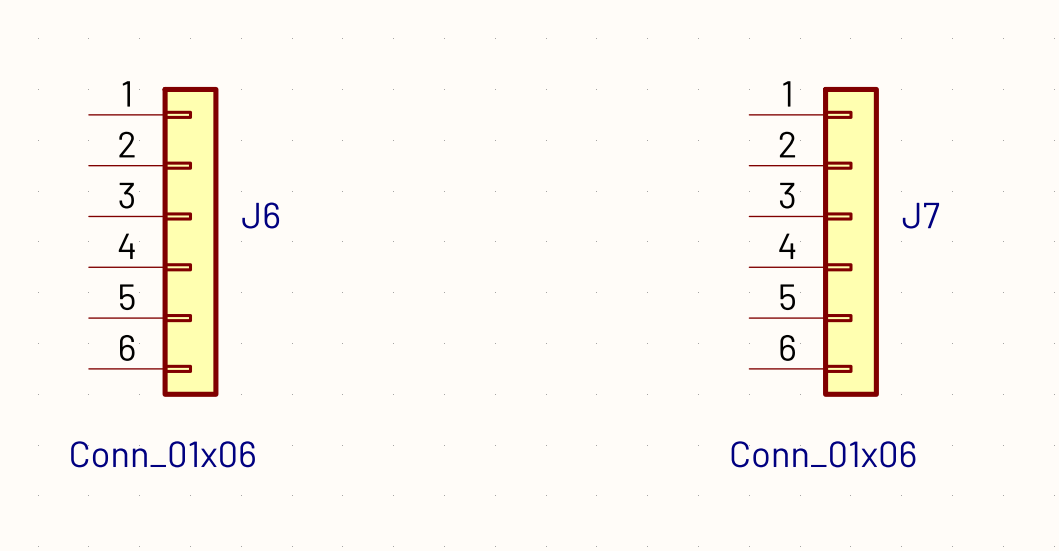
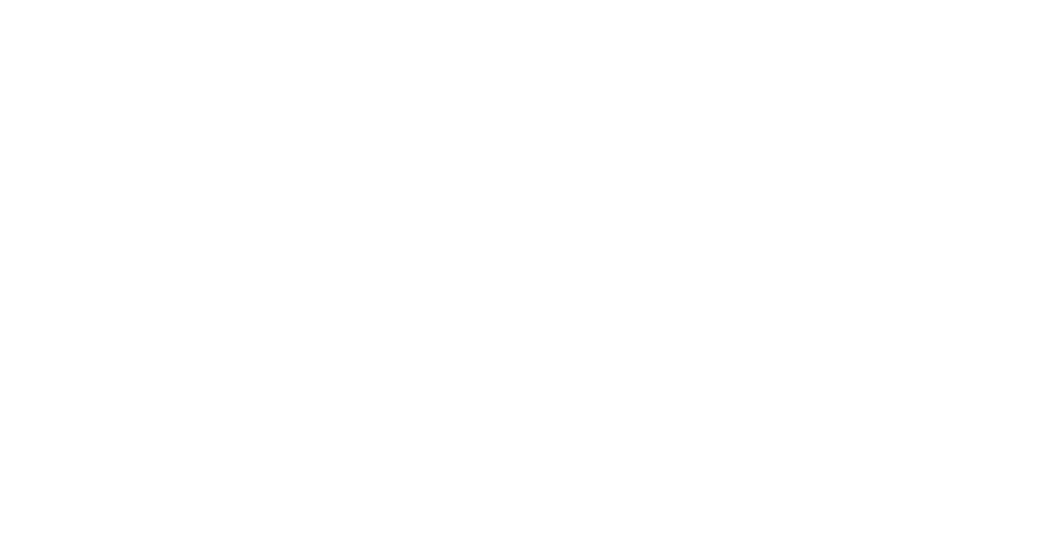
J6: Conn_01x06 (153, 241) -> none
J7: Conn_01x06 (814, 241) -> none

